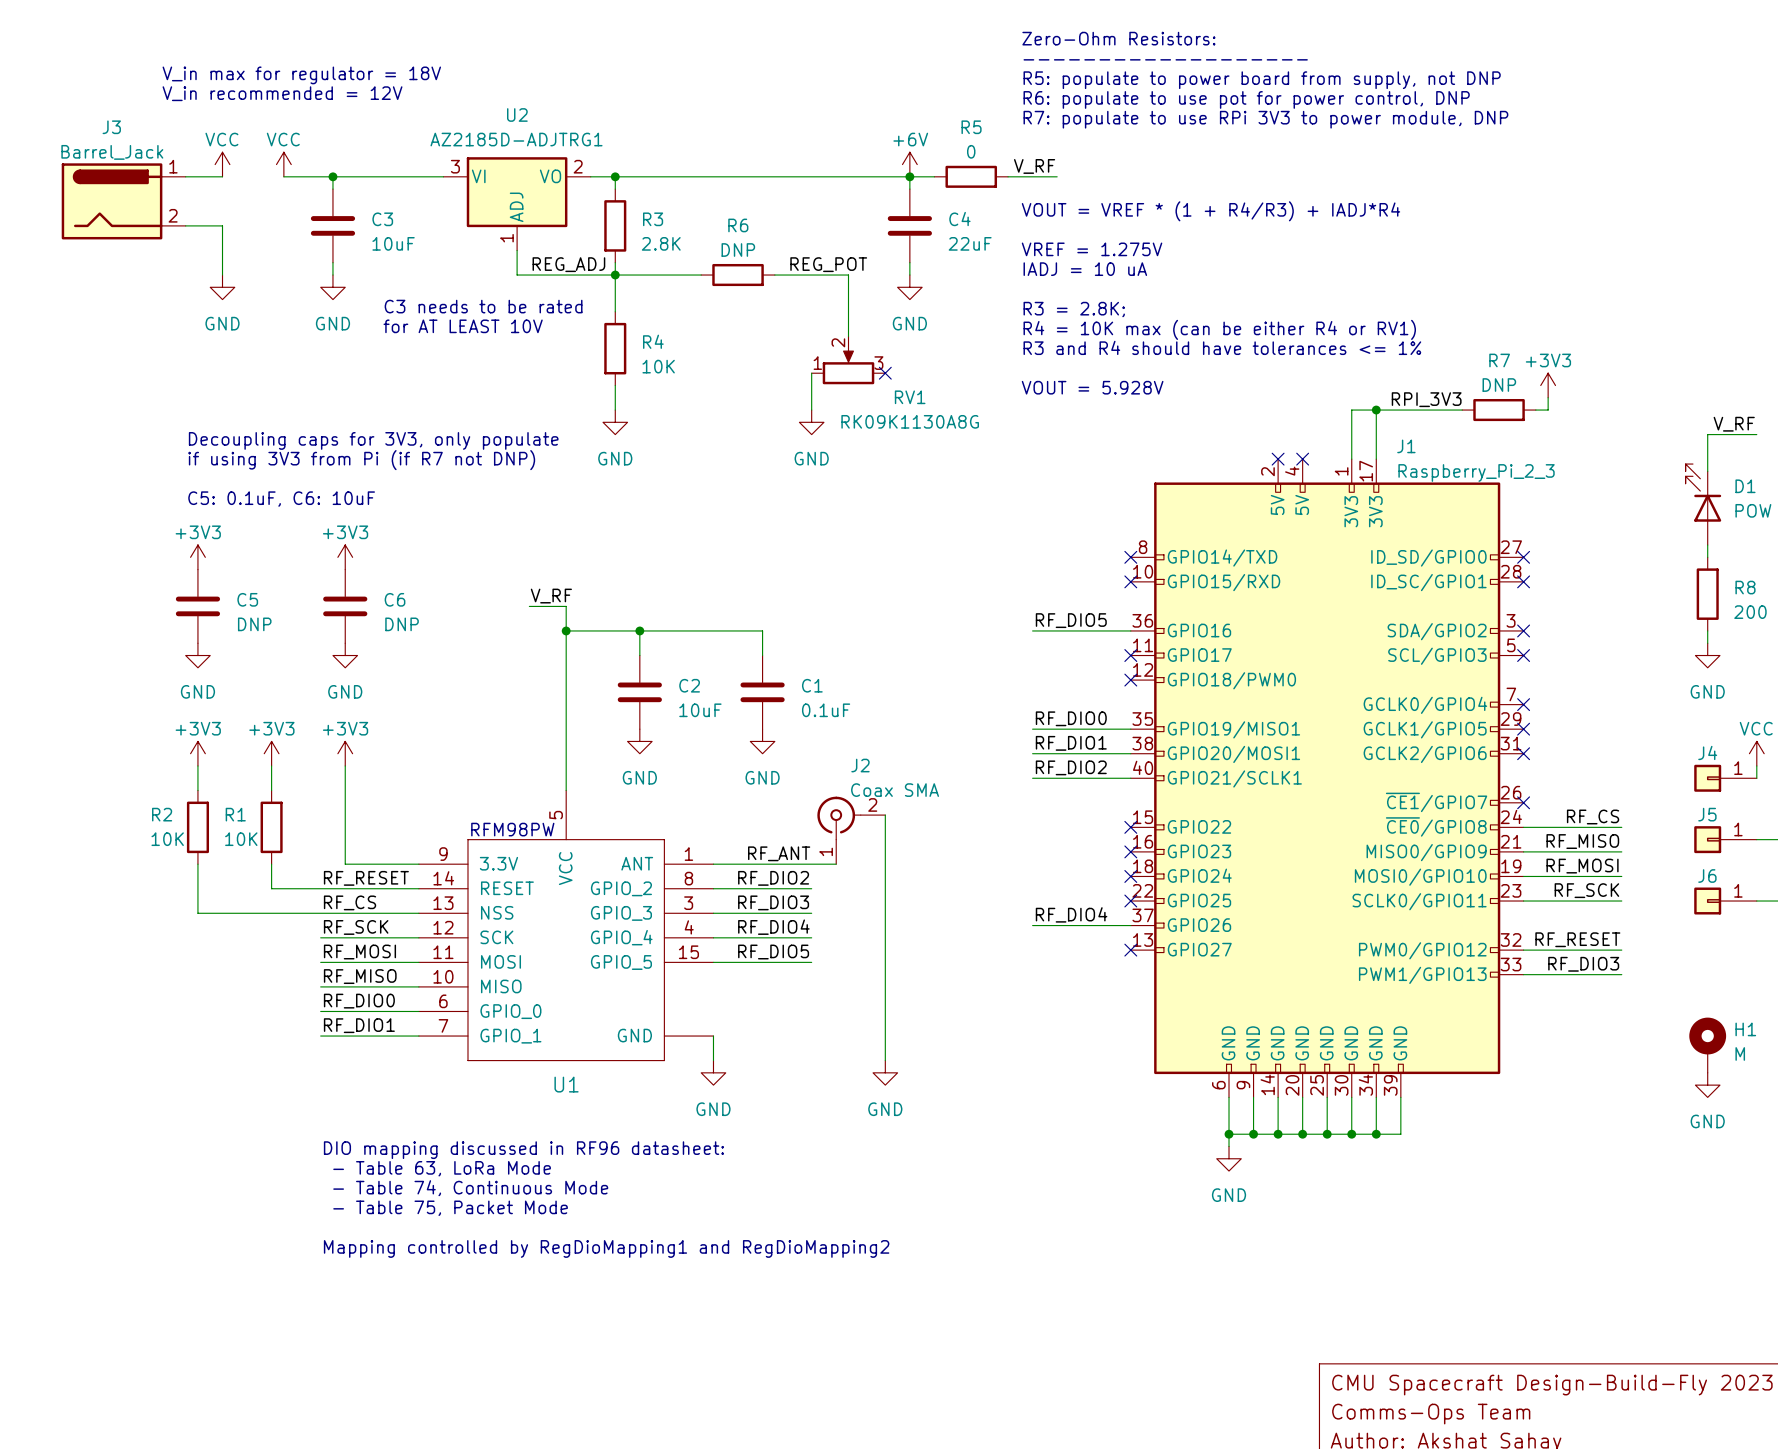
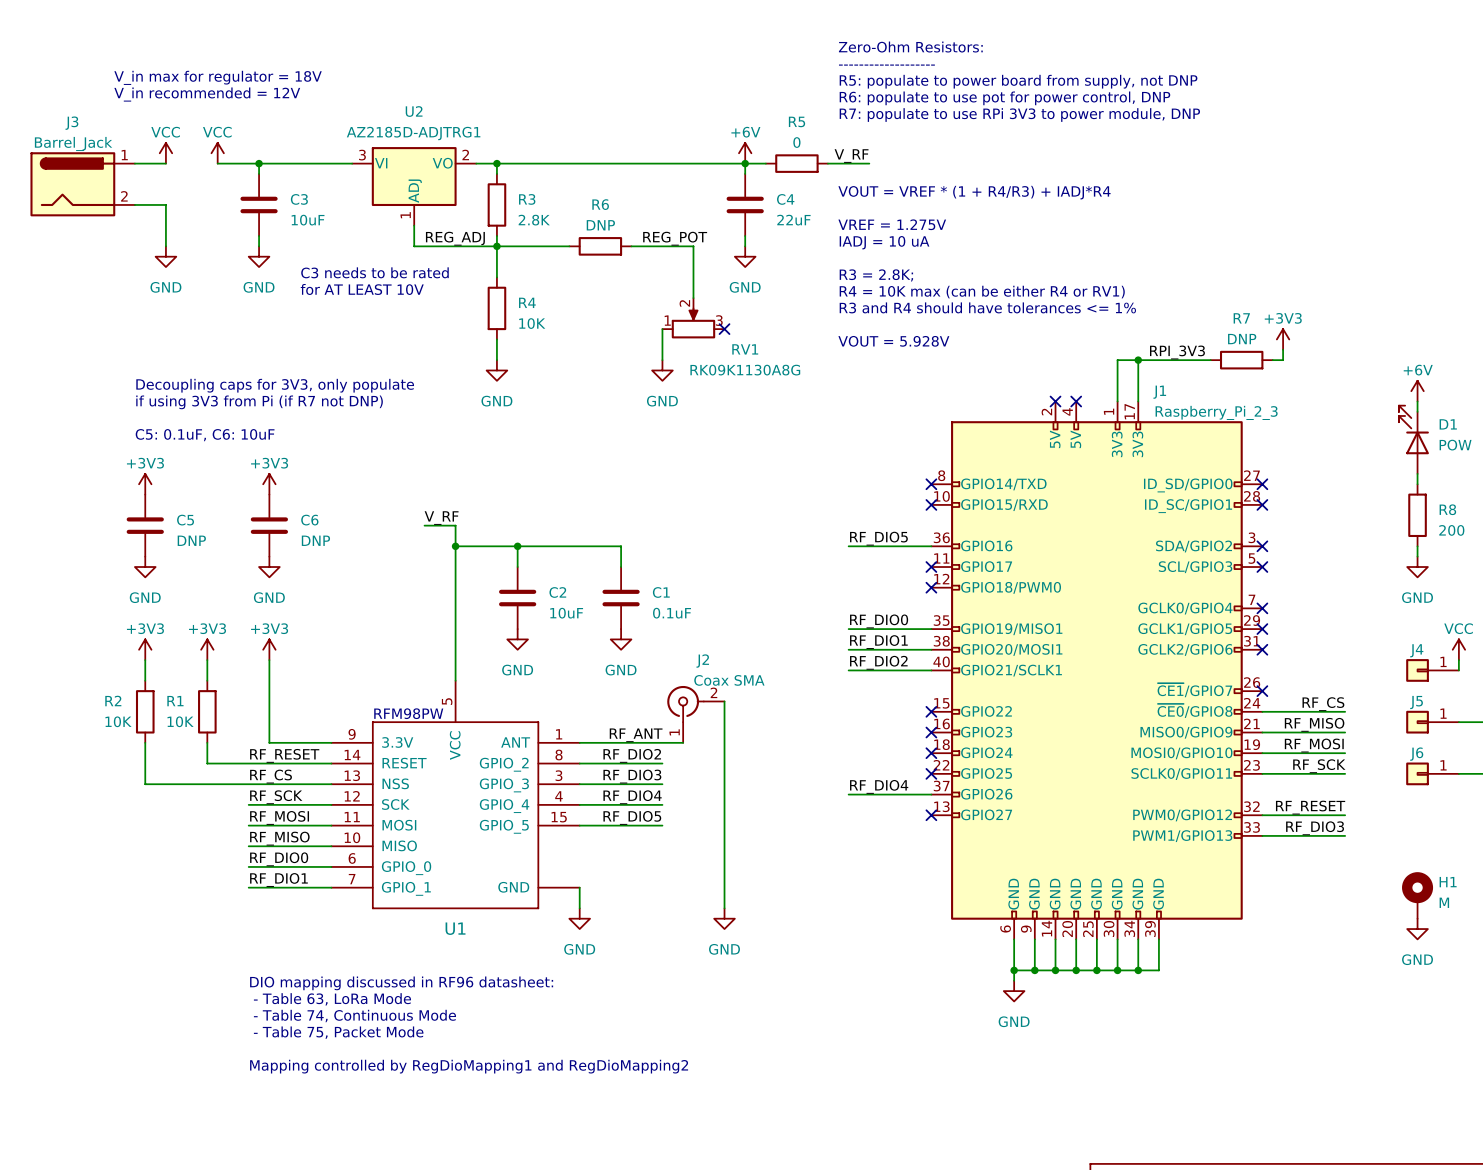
label: V_RF (1734, 424) -> none
wire: (1756, 434) (1707, 434) (1707, 459) -> none
power symbol: none -> +6V (1417, 391)

